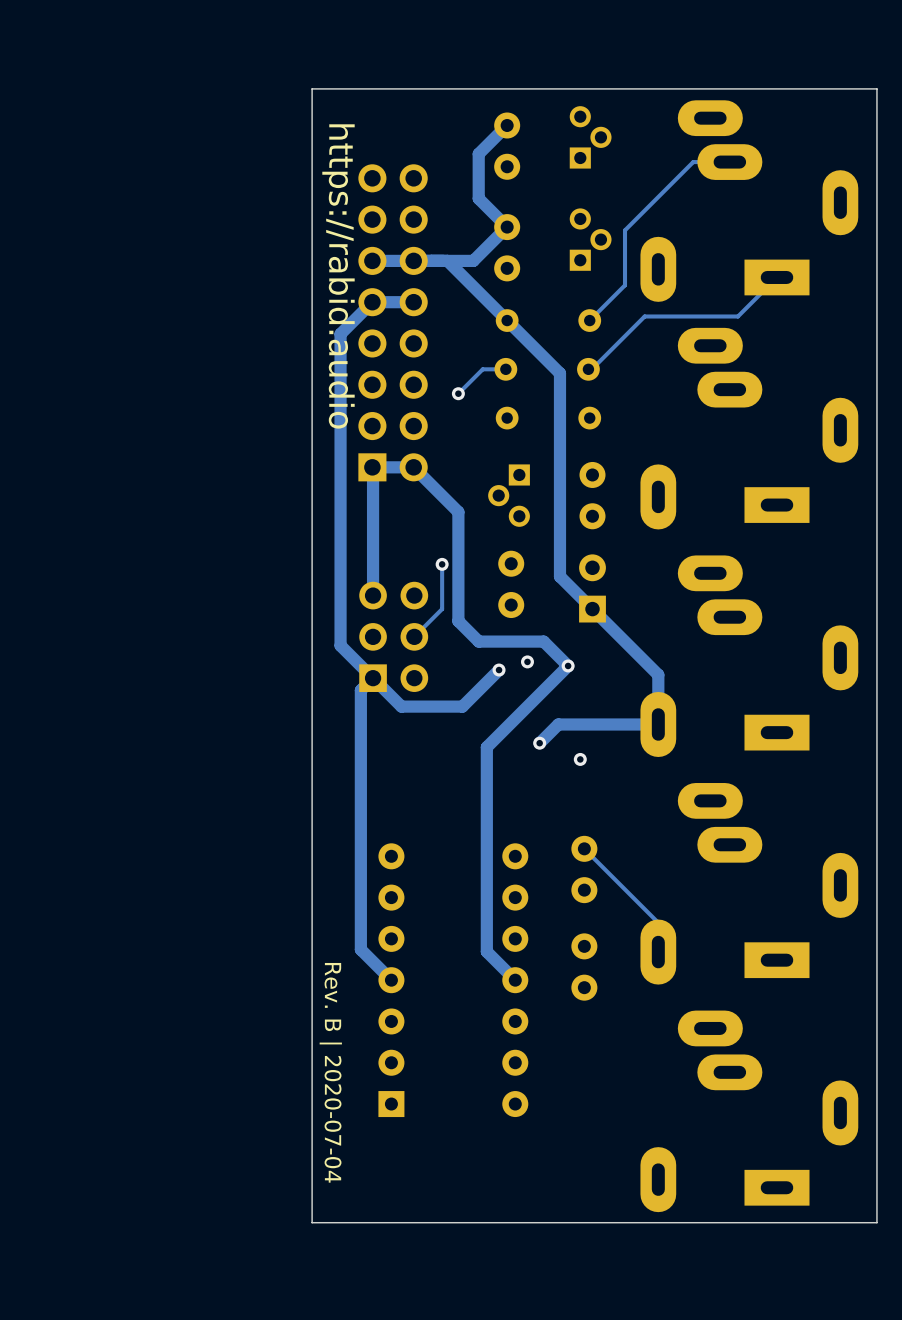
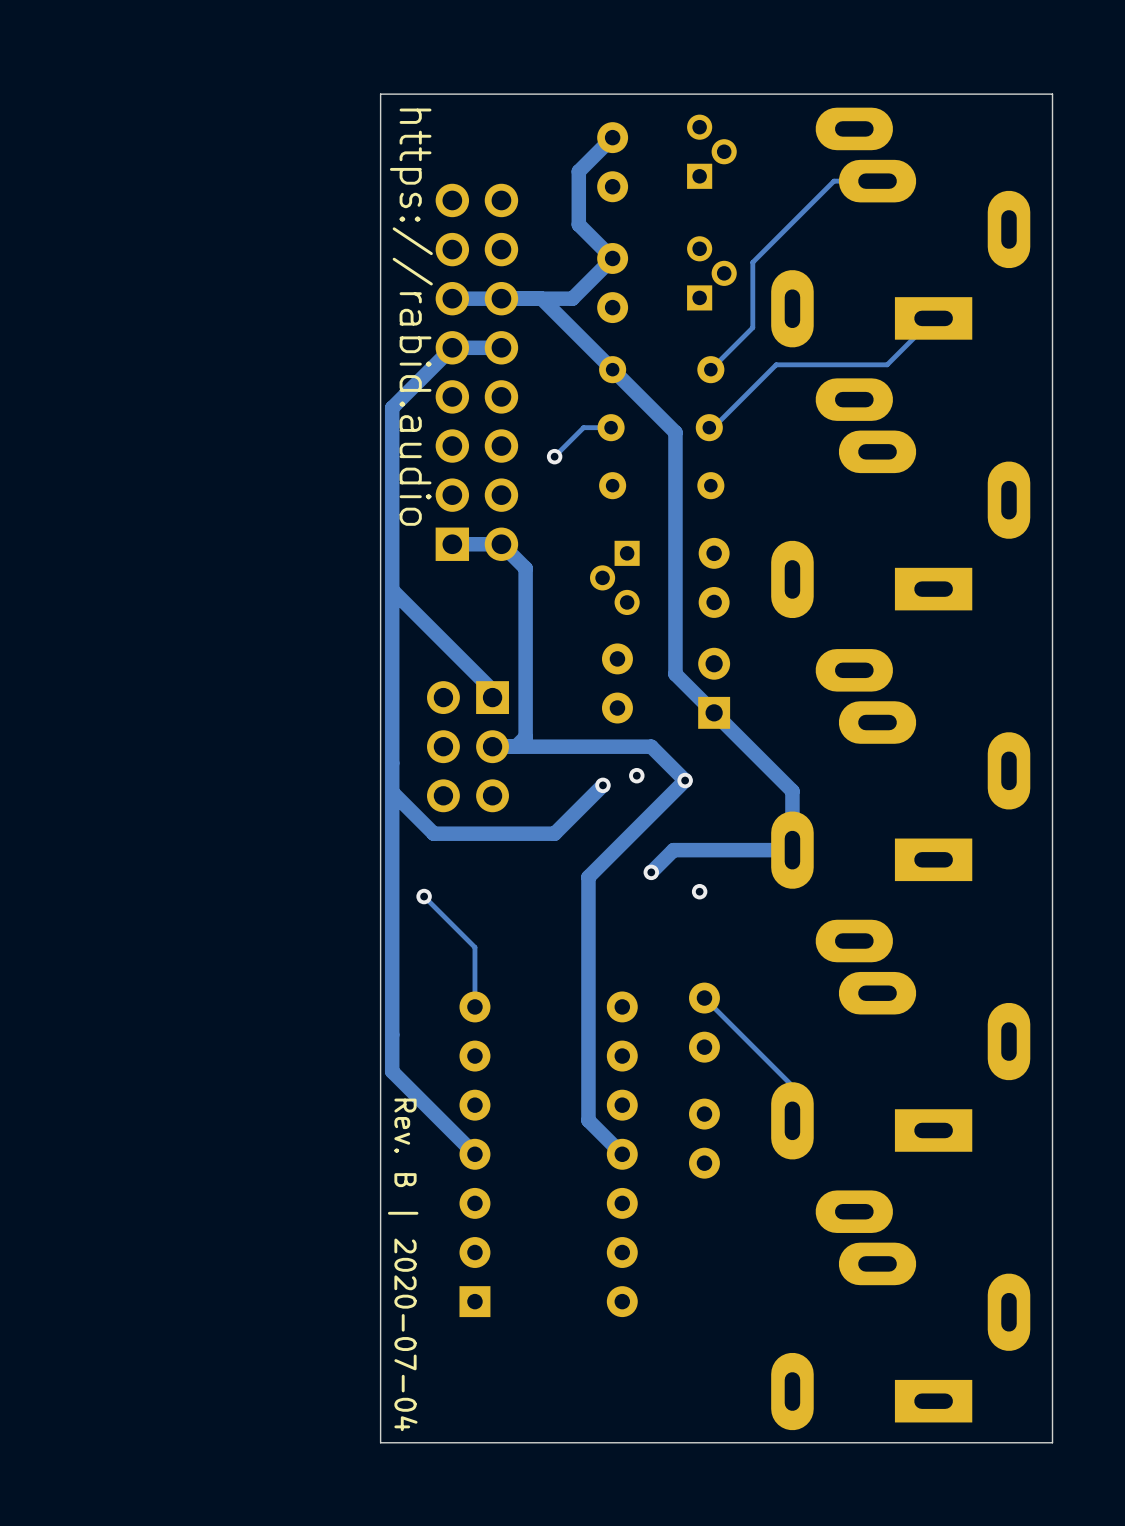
track: (340, 334) (340, 645) (401, 706) (462, 706) -> (414, 385) (392, 407) (392, 1071) (438, 1117)
track: (372, 467) (373, 595) -> none
track: (434, 487) (458, 512) (458, 621) (478, 641) (543, 641) -> (525, 568) (525, 737) (515, 746)
track: none -> (392, 590) (492, 690) (492, 697)
track: (442, 564) (442, 609) (414, 636) -> none
via: (442, 564) -> none
part rotation: 0° (393, 636) -> 180° (468, 746)
track: none -> (492, 746) (651, 746) (656, 751)
track: none -> (392, 792) (433, 833) (554, 833) (559, 828)
track: (373, 678) (360, 690) (360, 949) -> none
track: none -> (424, 896) (474, 947) (474, 1006)
via: none -> (424, 896)

